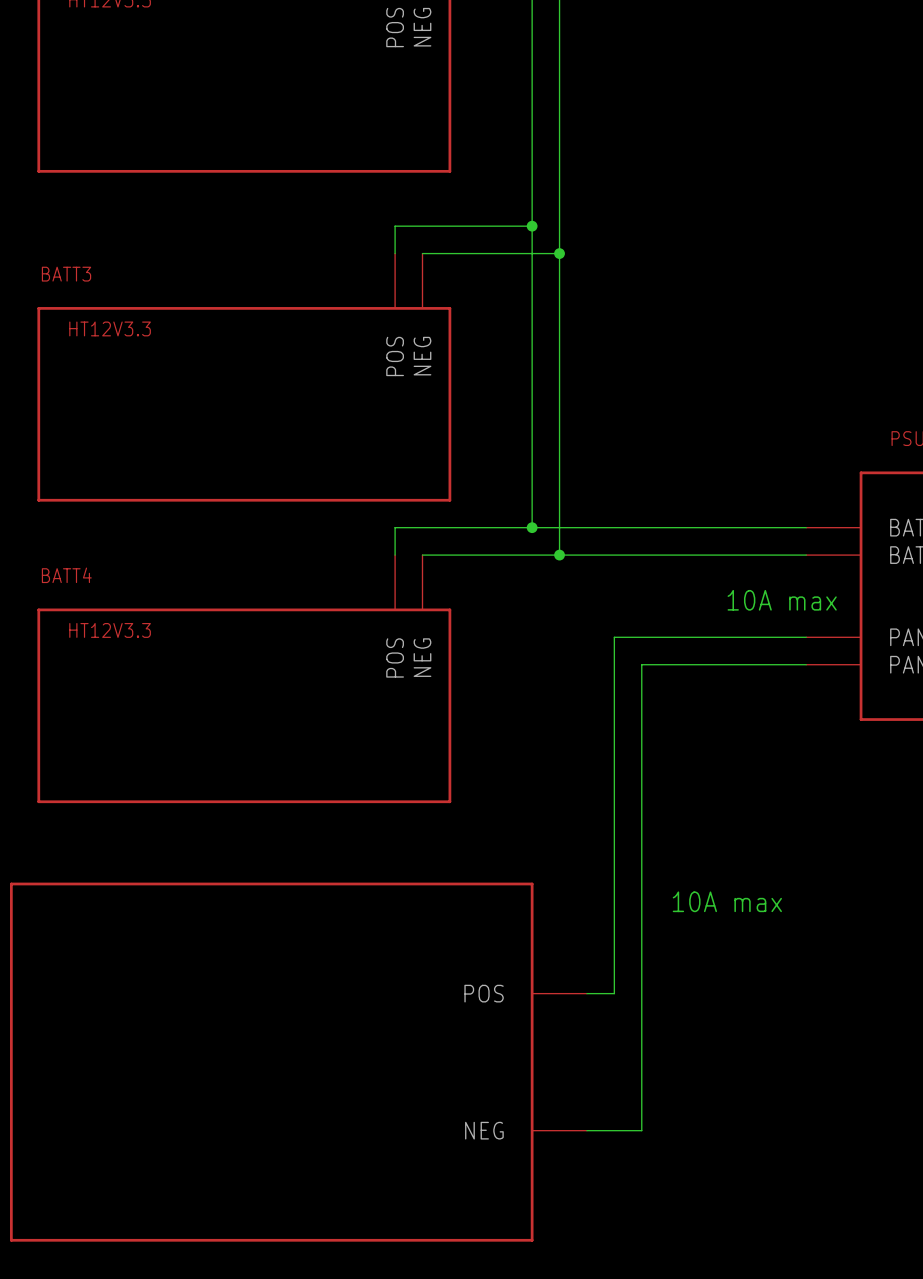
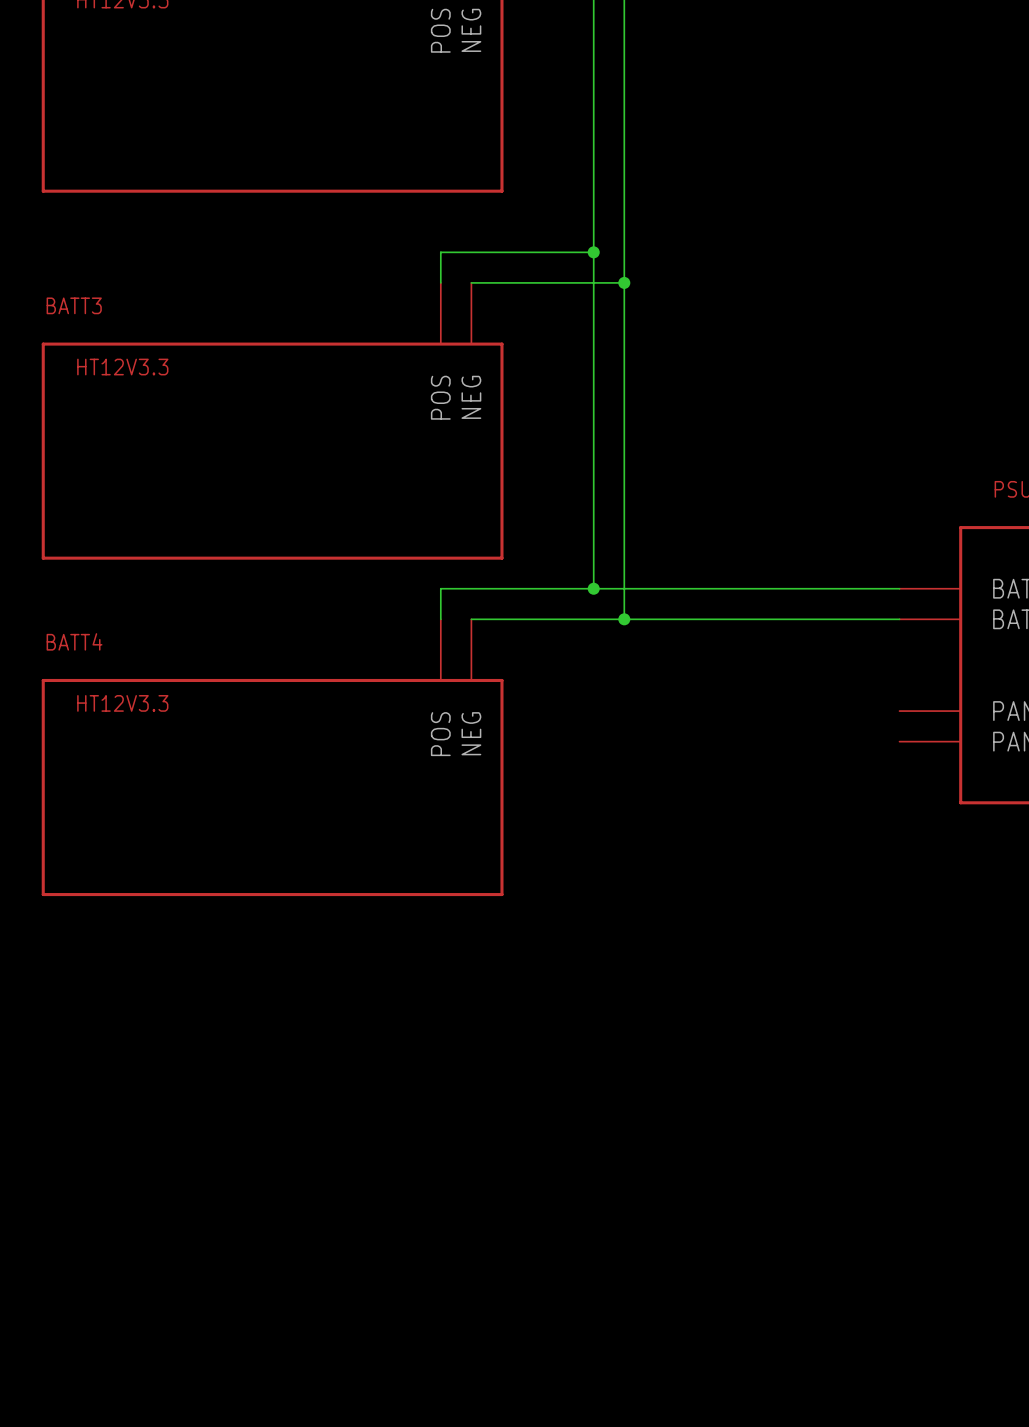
text: 10A max (782, 600) -> none
wire: (806, 637) (614, 637) (614, 993) (586, 993) -> none
wire: (806, 664) (641, 664) (641, 1130) (586, 1130) -> none
text: 10A max (727, 901) -> none
part: (298, 1062) -> none

